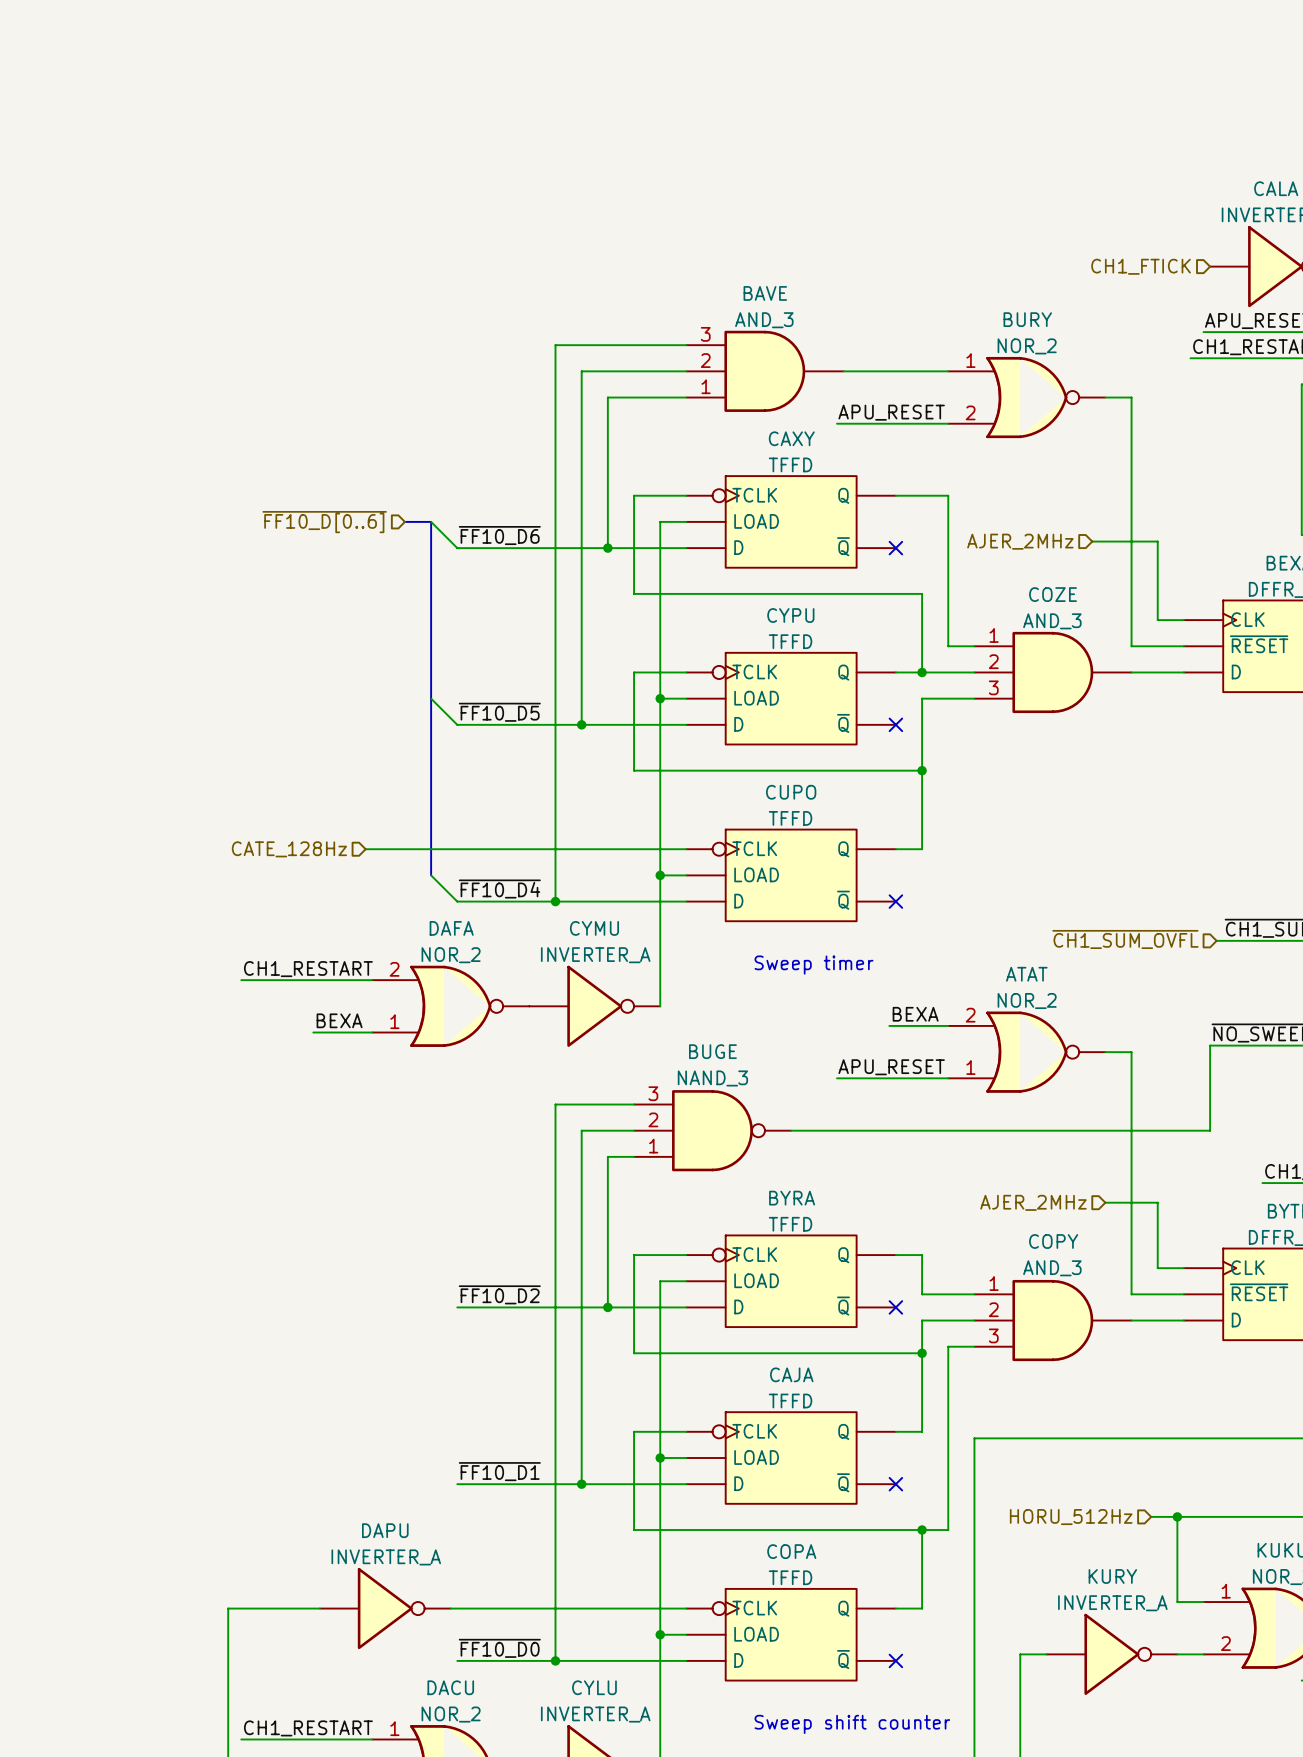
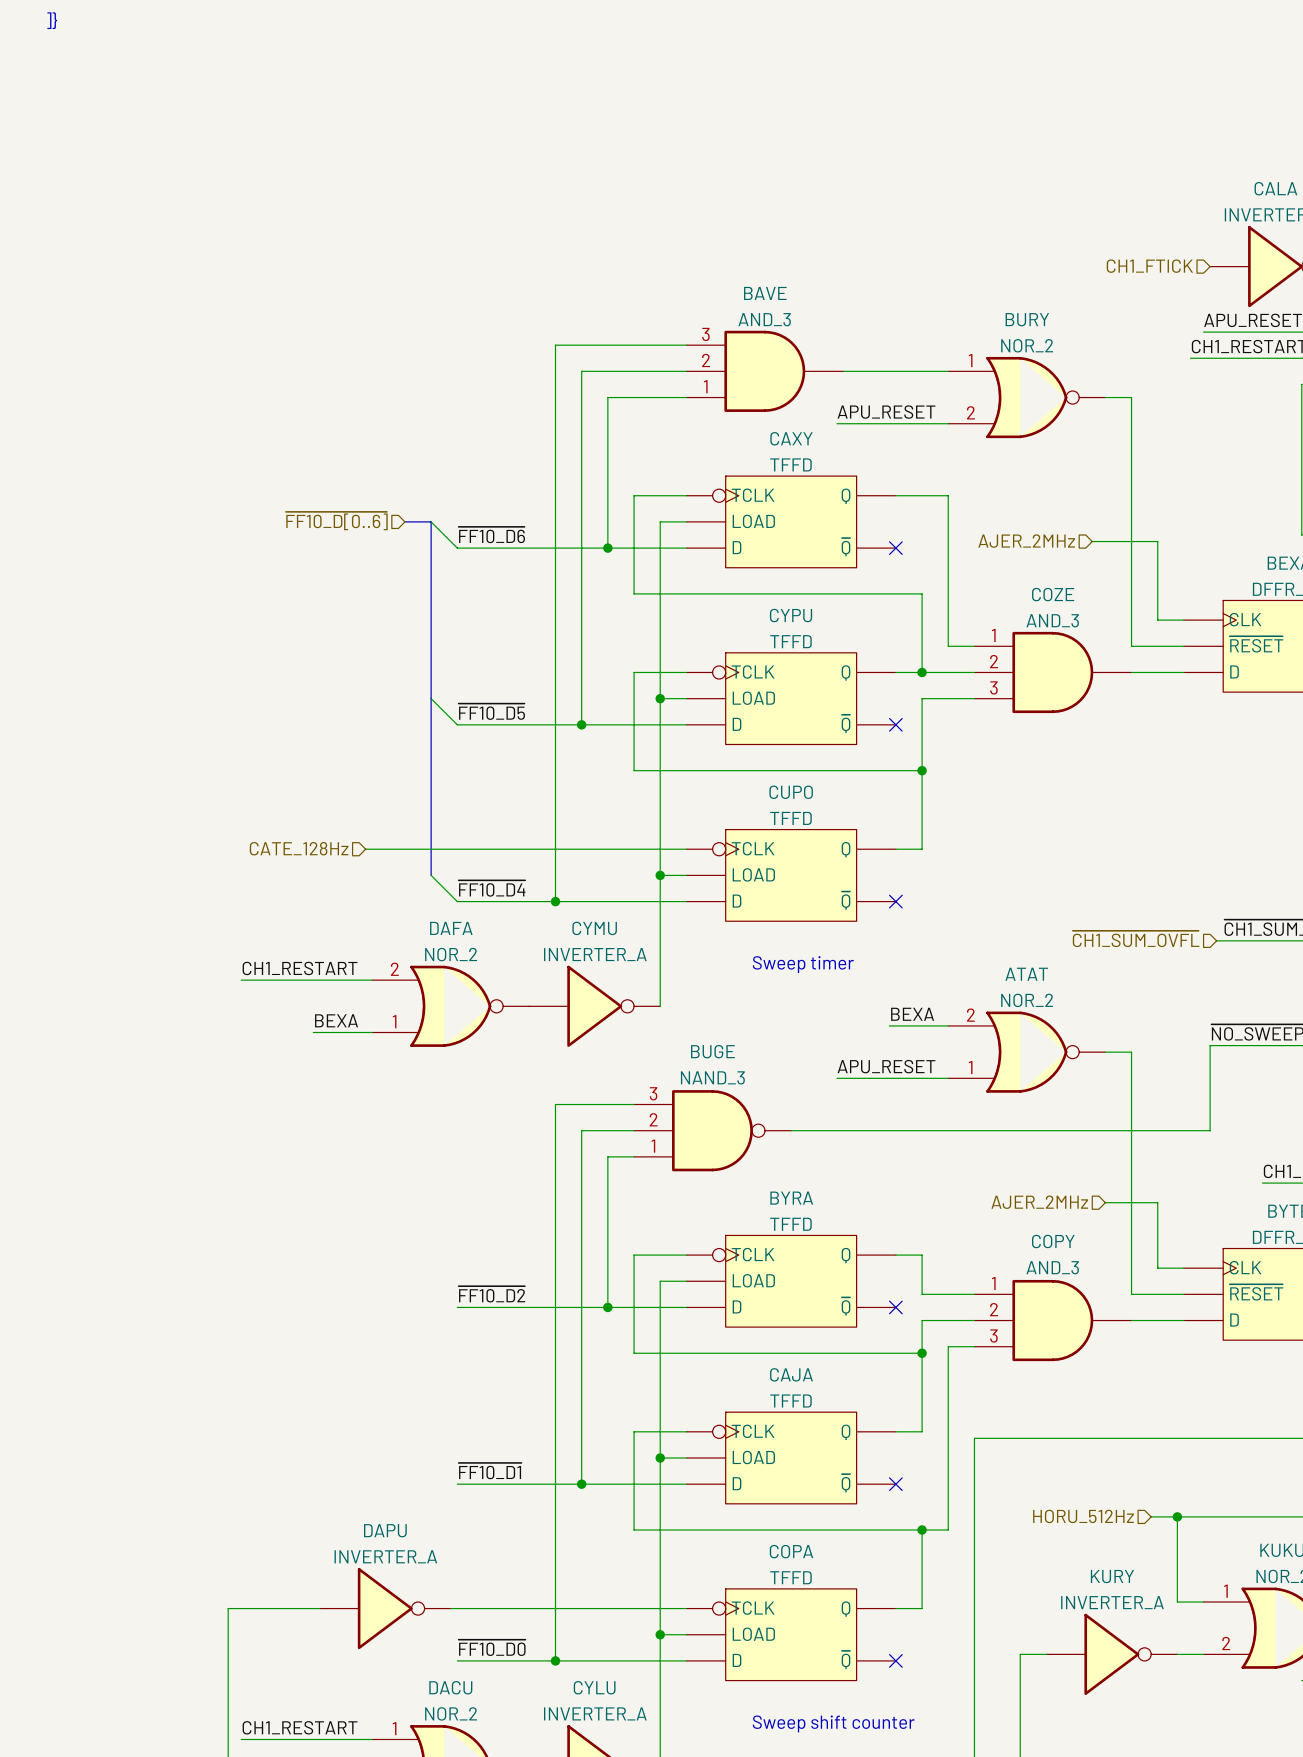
text: none -> ]} (52, 20)

